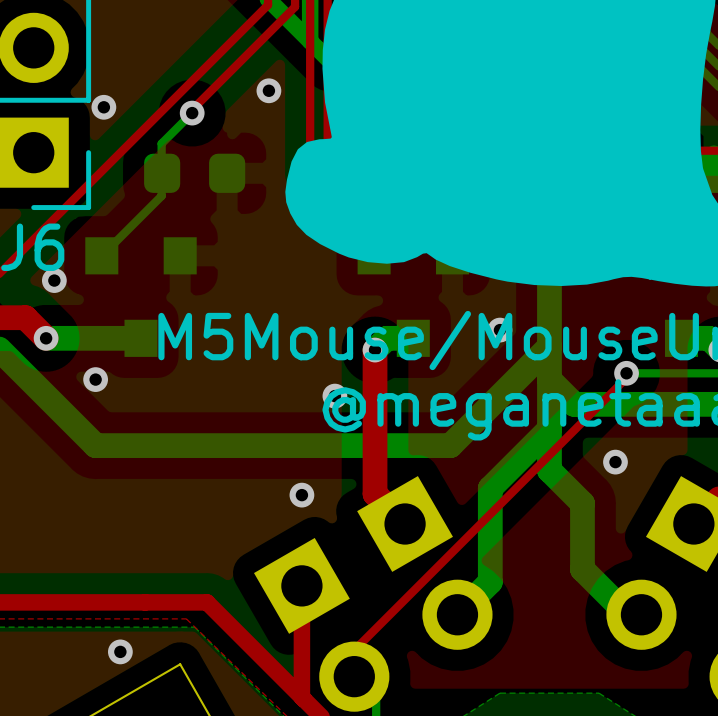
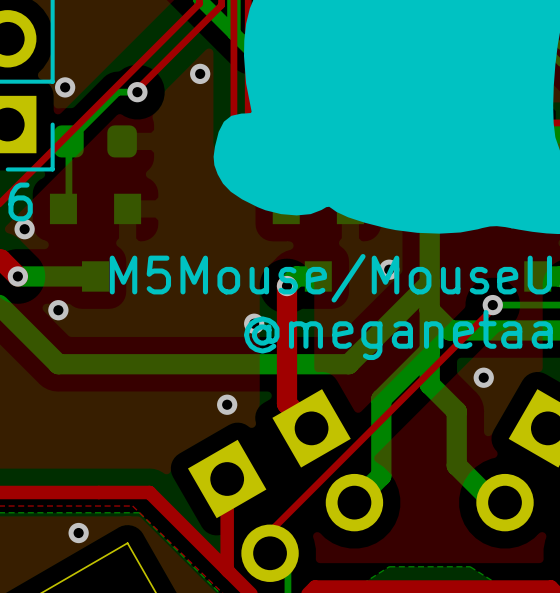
bottom track: (192, 113) (161, 143) (161, 195) (108, 249) -> (137, 92) (118, 92) (68, 141) (68, 203)
part position: (194, 173) -> (95, 141)

